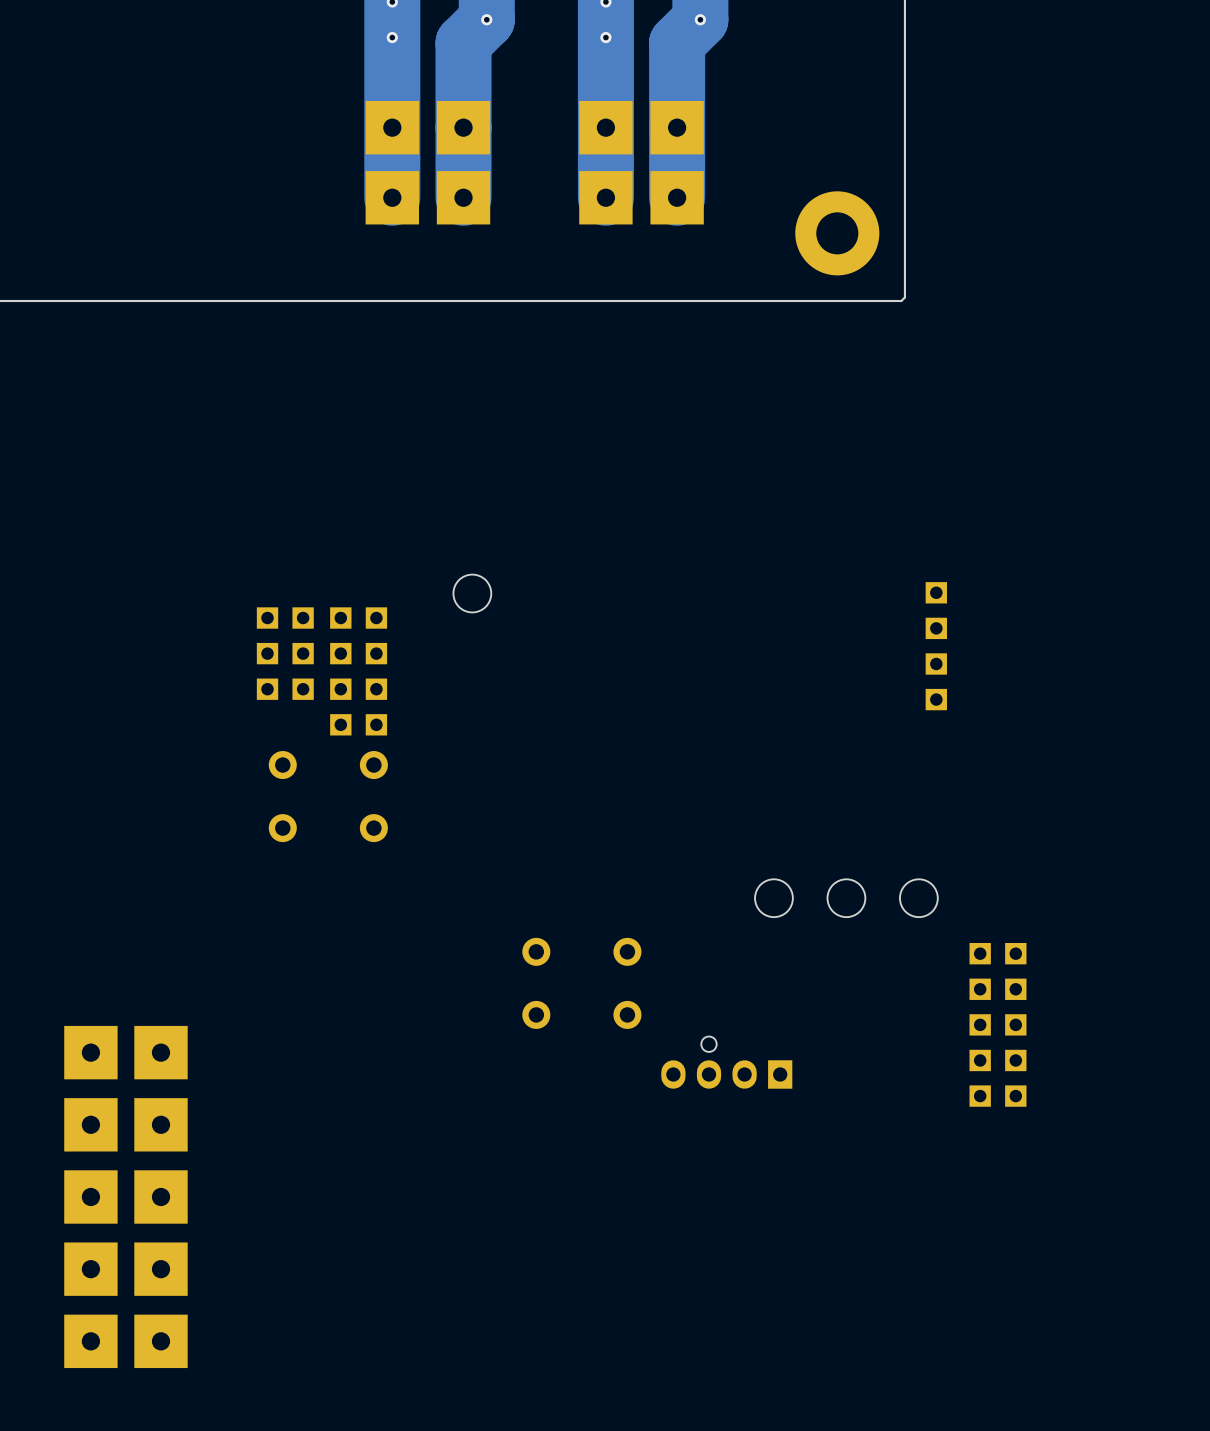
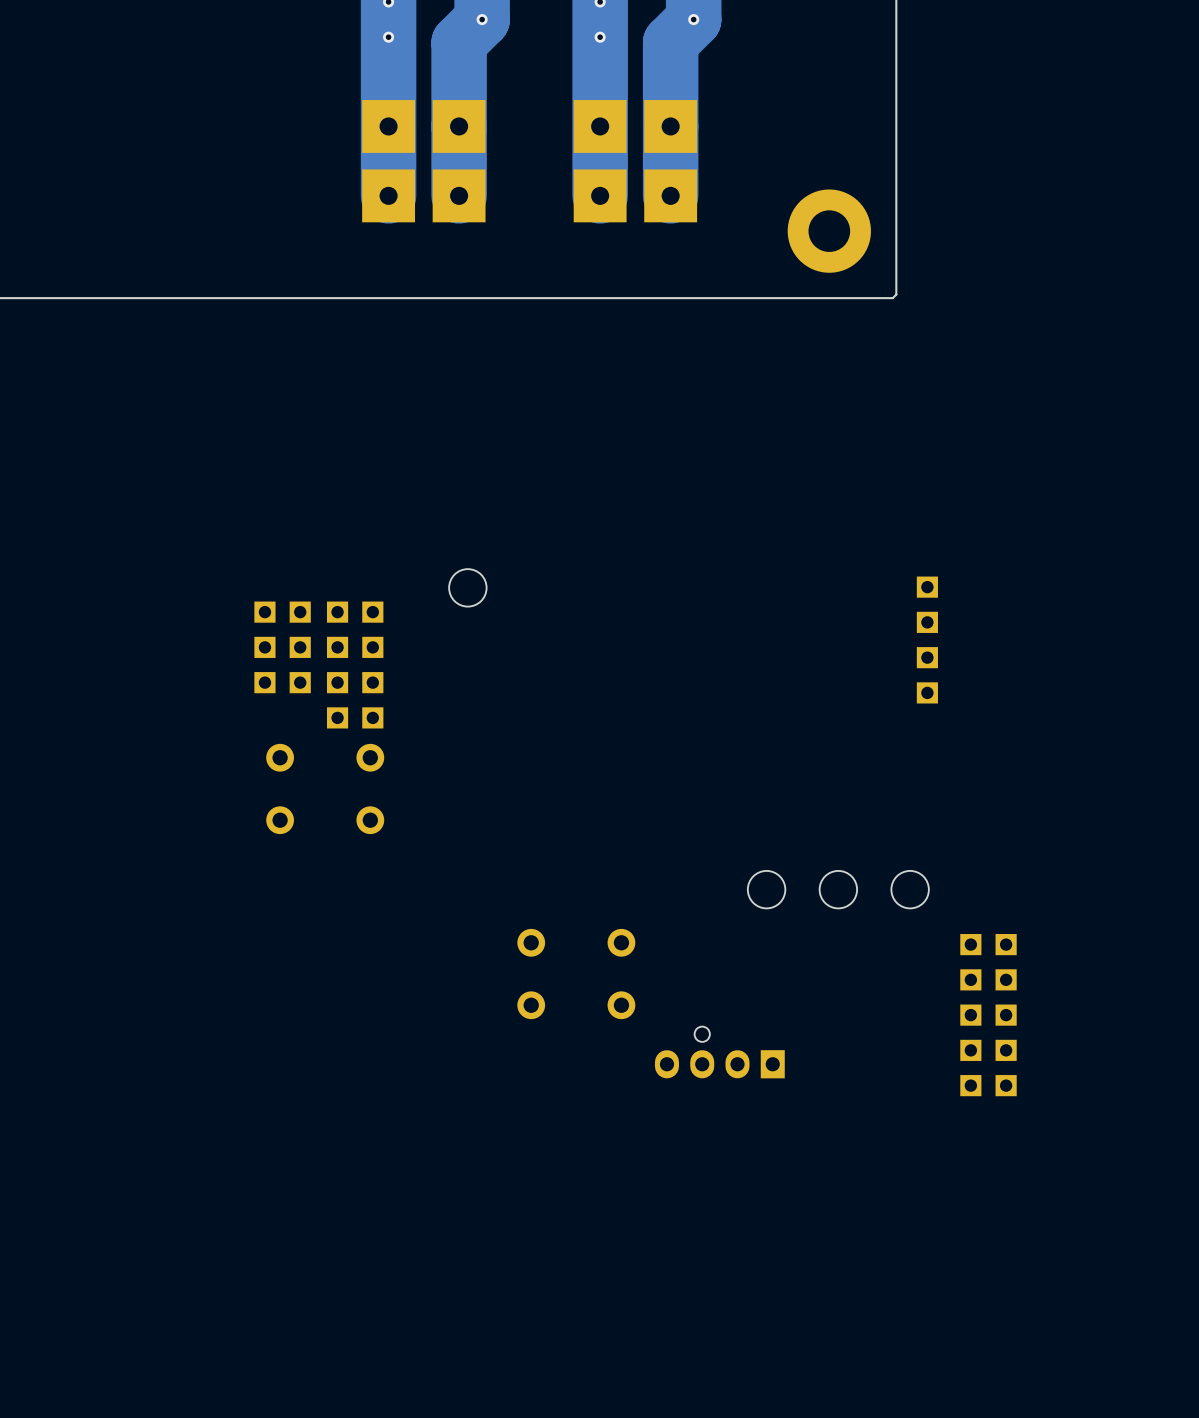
part: (125, 1052) -> none
part: (125, 1124) -> none
part: (125, 1196) -> none
part: (125, 1269) -> none
part: (125, 1341) -> none

